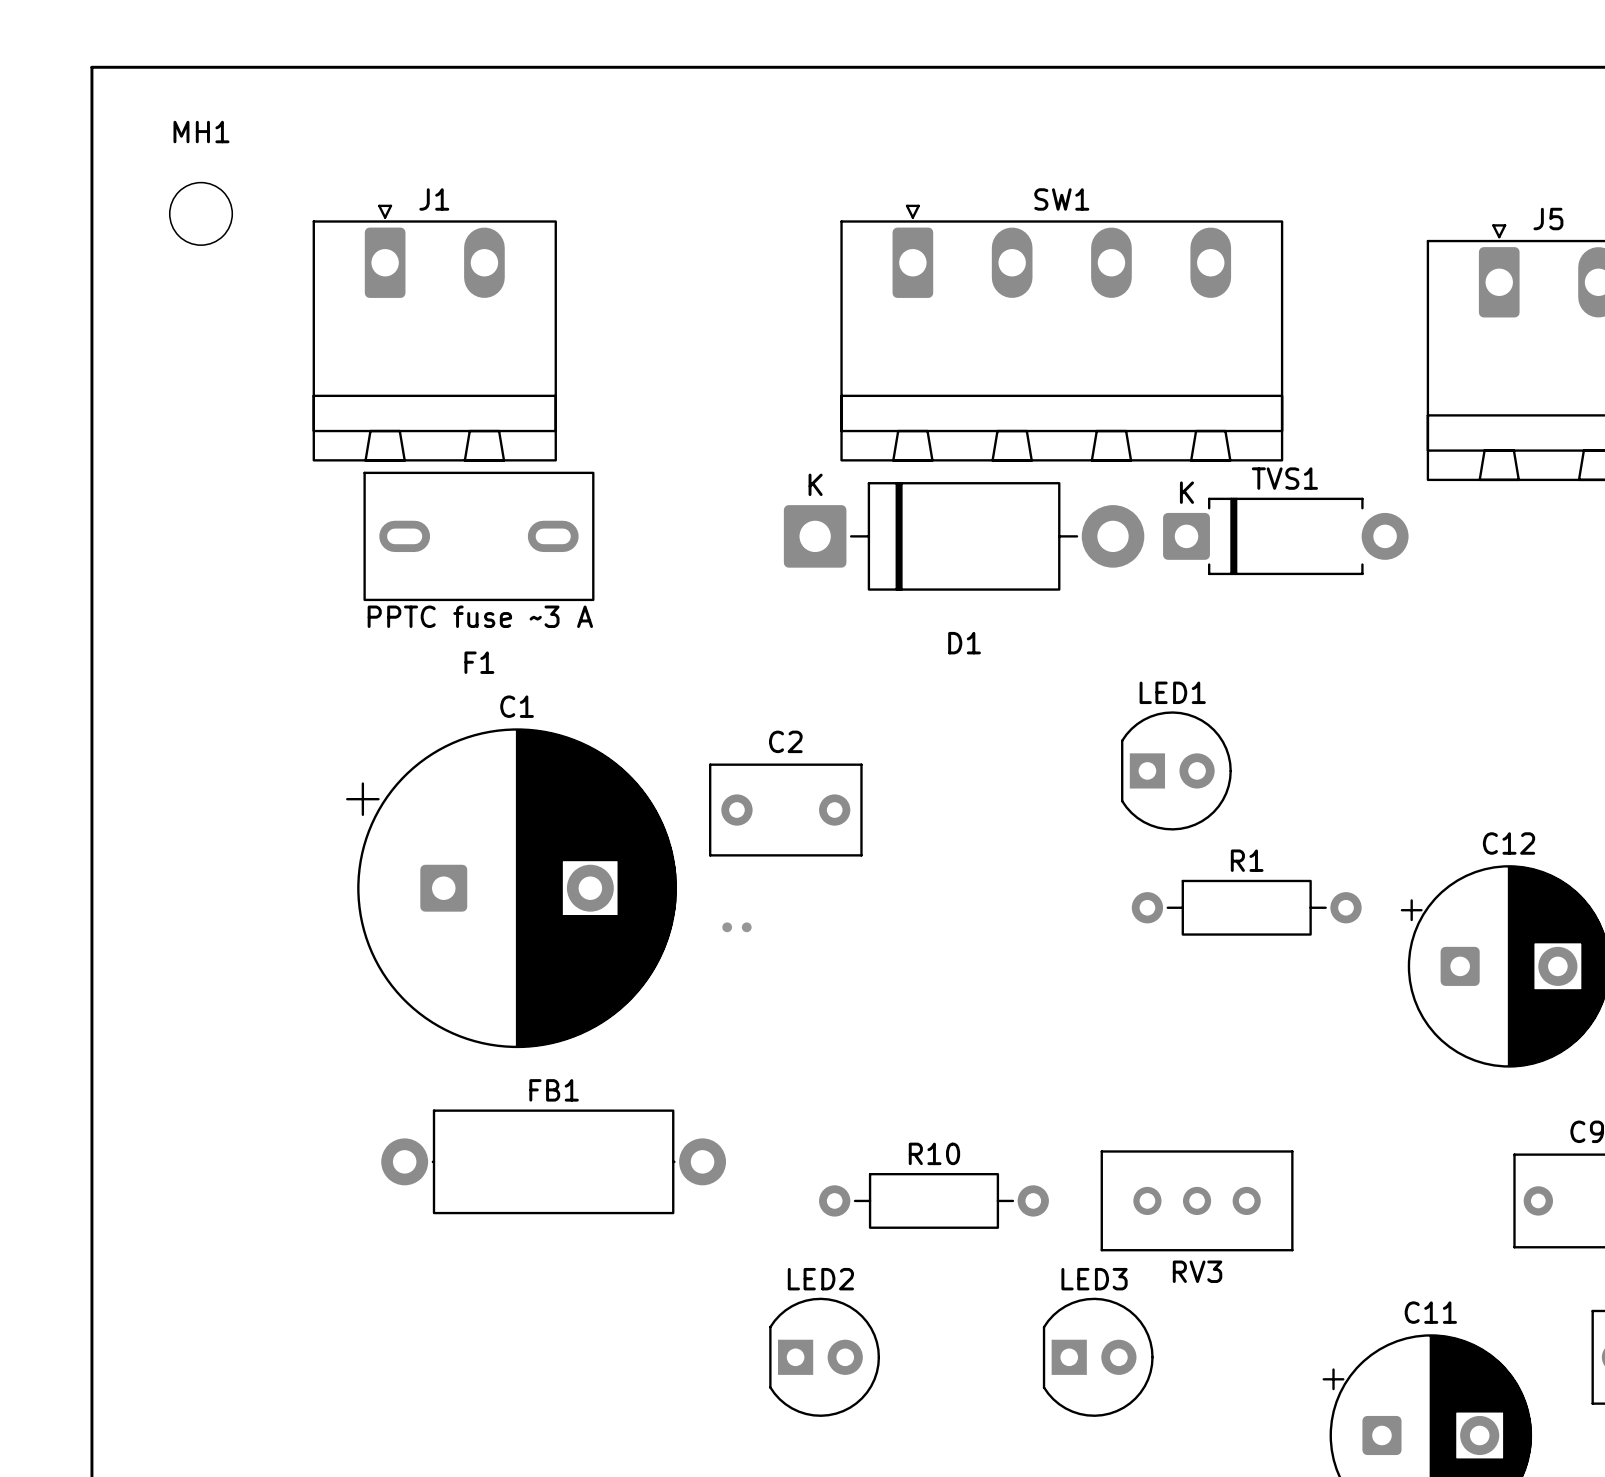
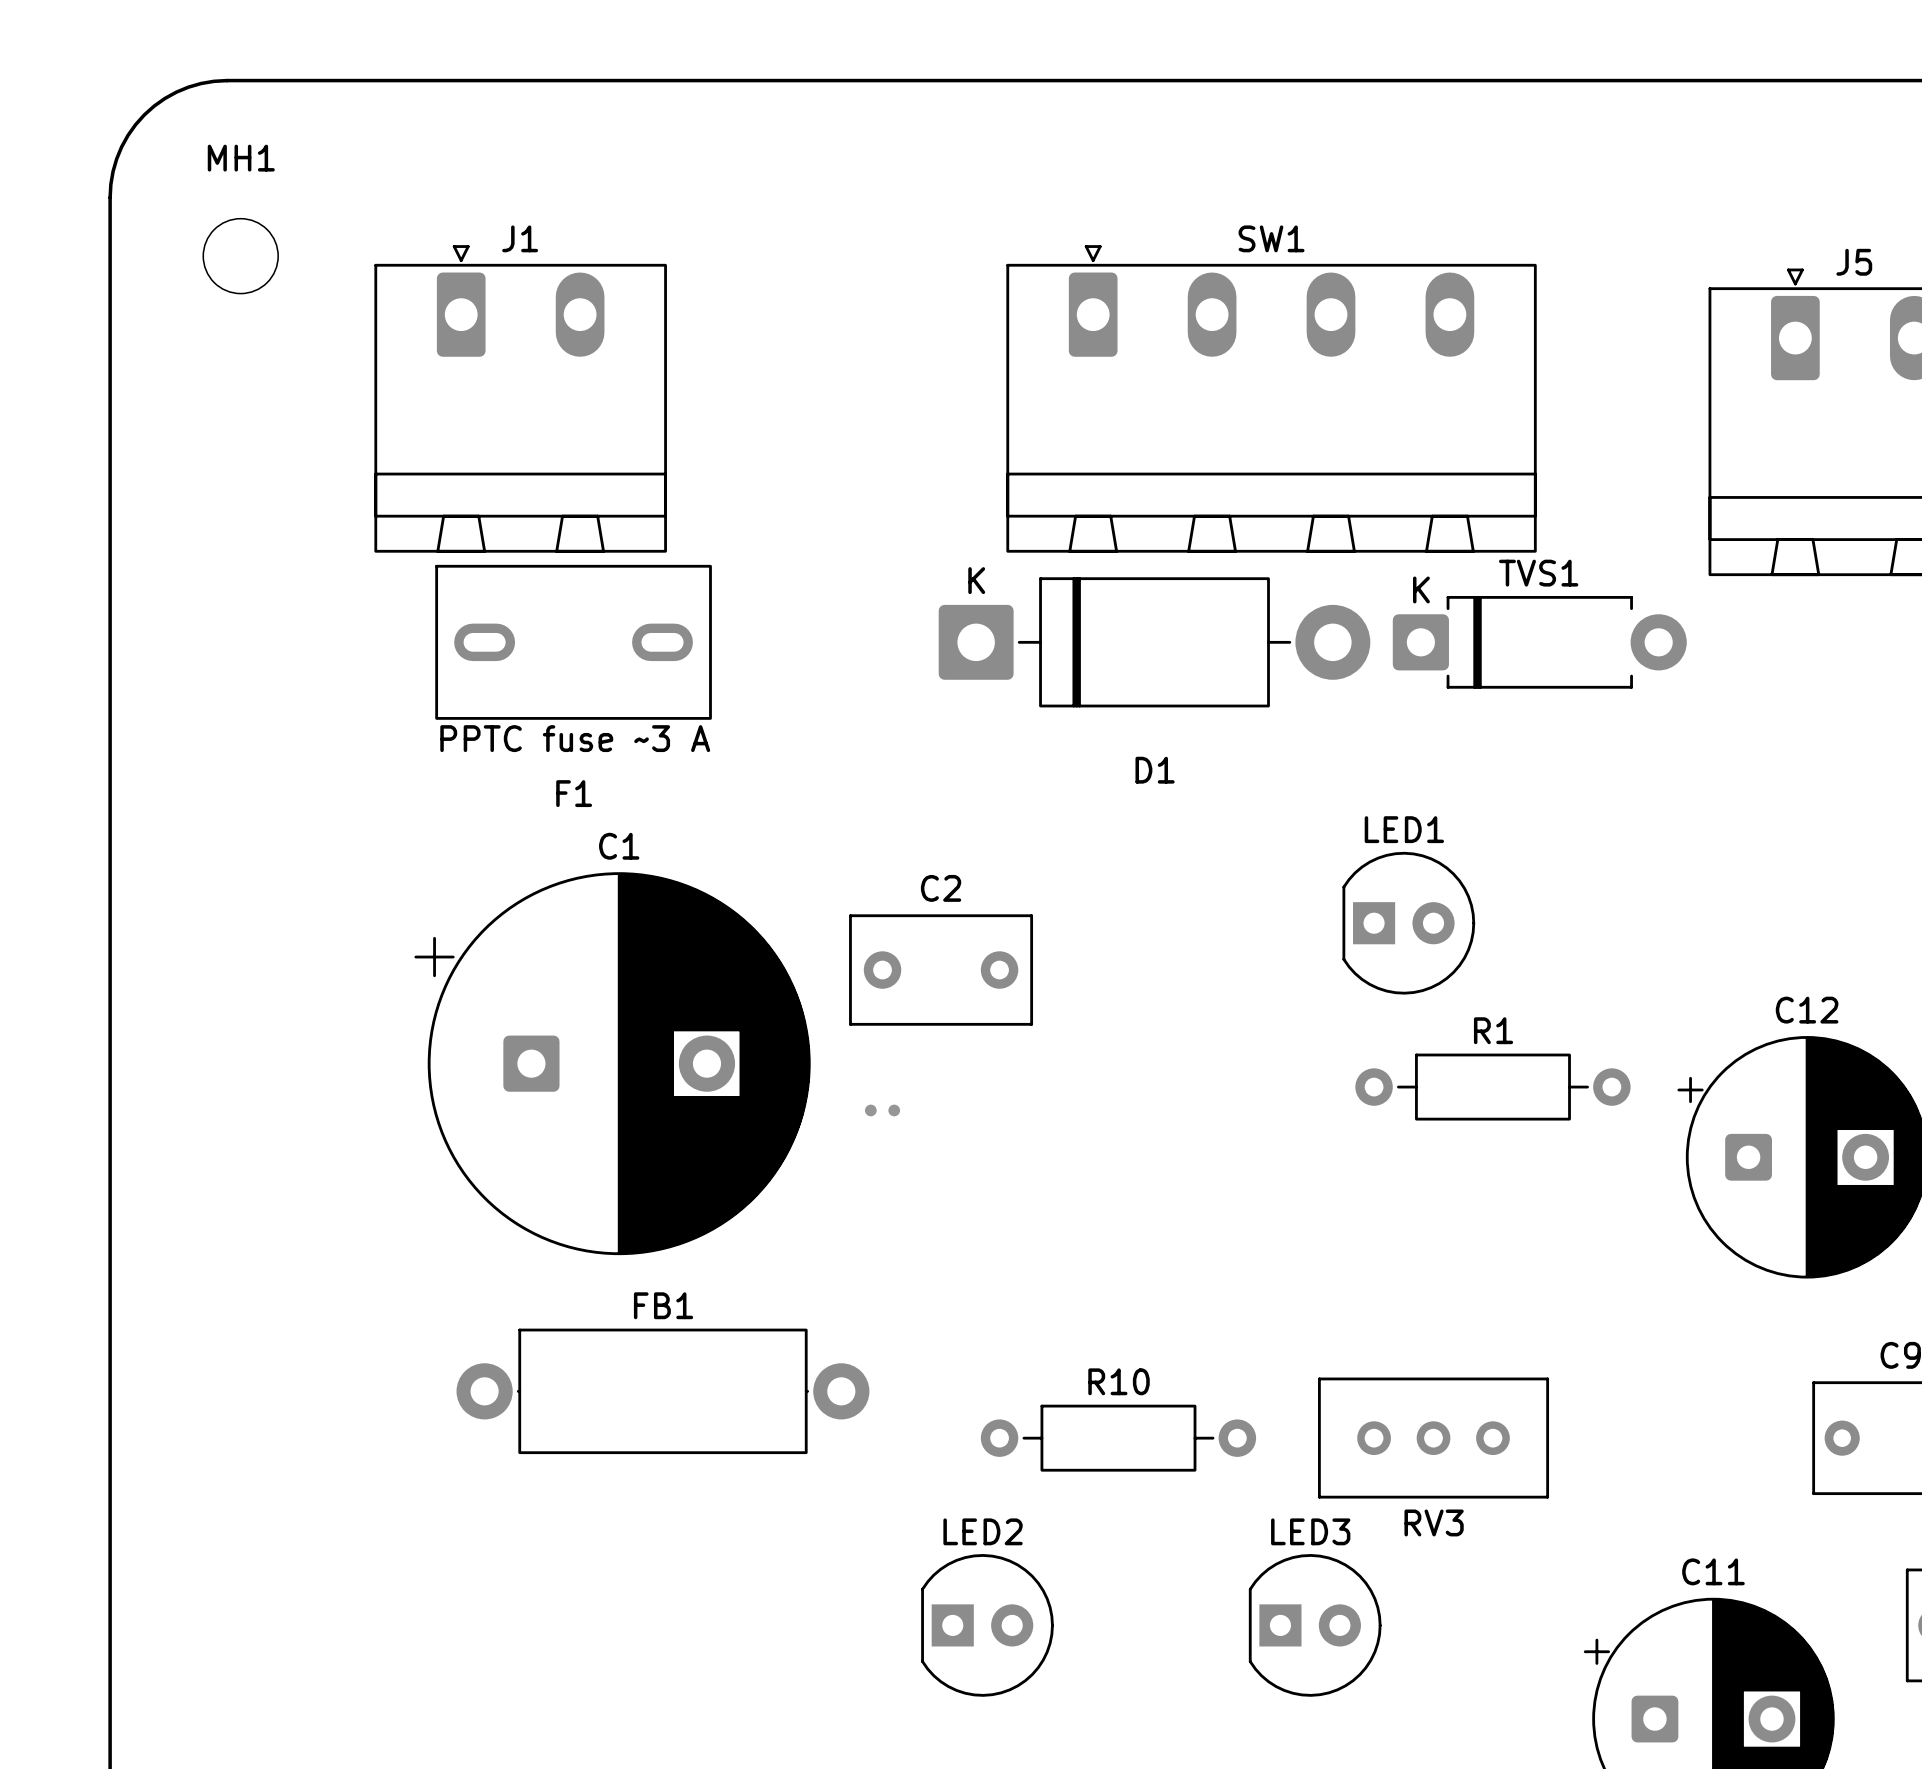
board edge: (189, 67) (91, 67) (91, 165) -> (227, 80) (201, 83) (176, 92) (144, 114) (128, 135) (116, 158) (110, 197)

